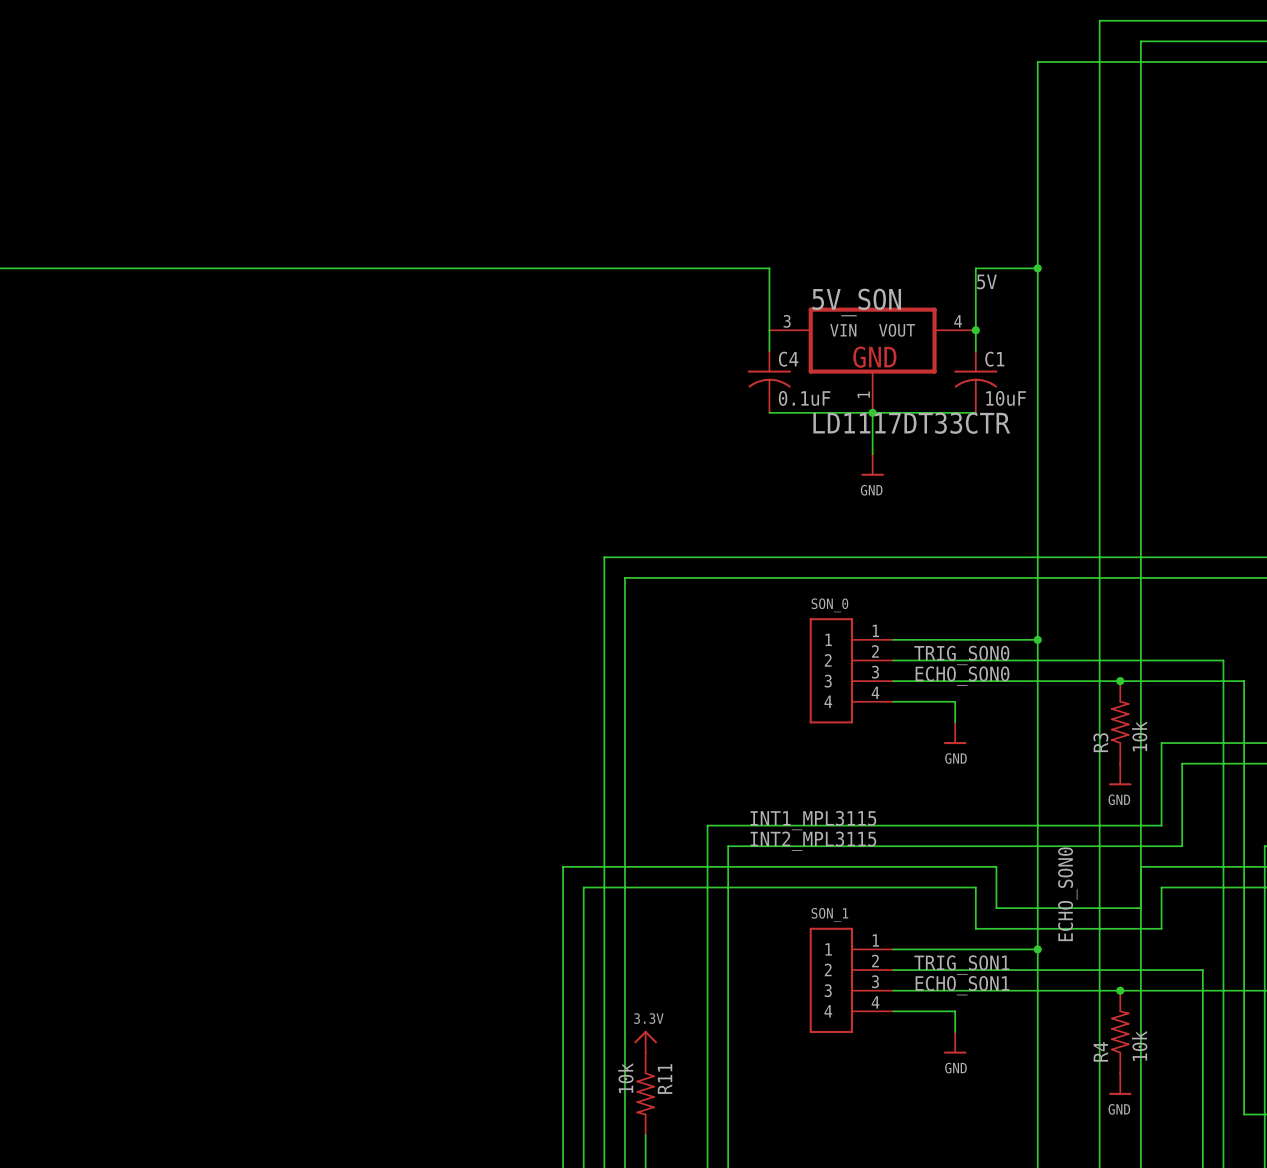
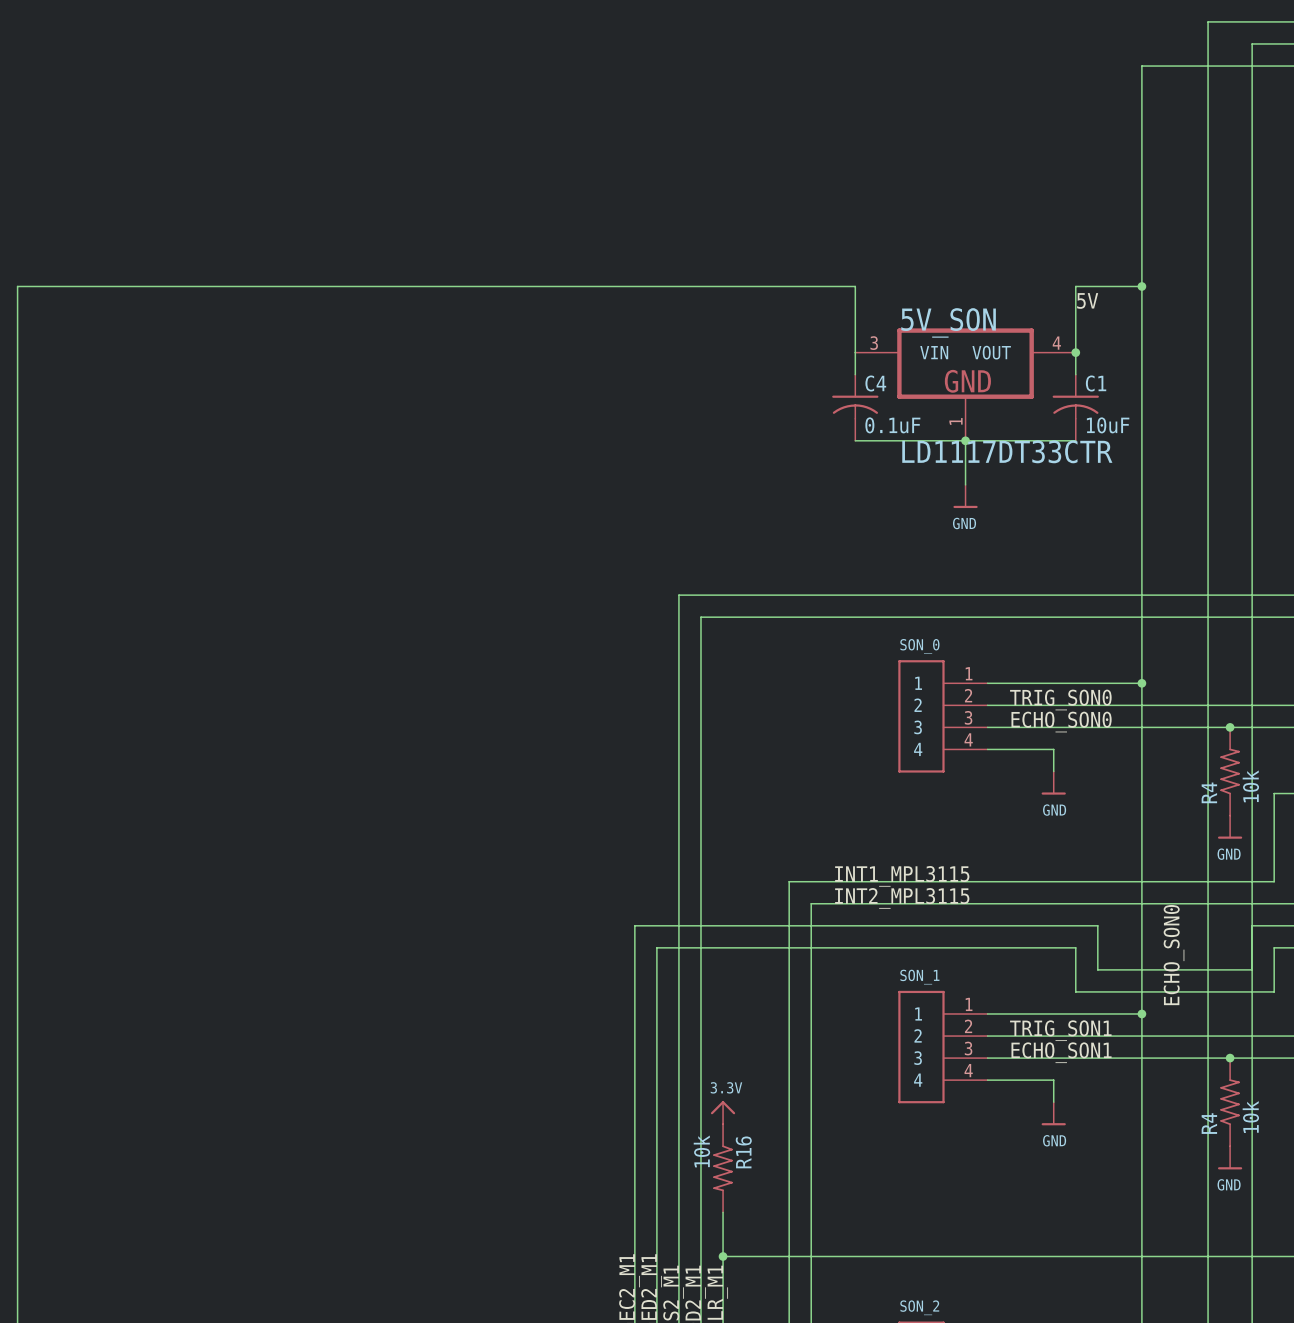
R3 name: R3 (1100, 742) -> R4 (1209, 792)
R11 name: R11 (665, 1079) -> R16 (743, 1152)

